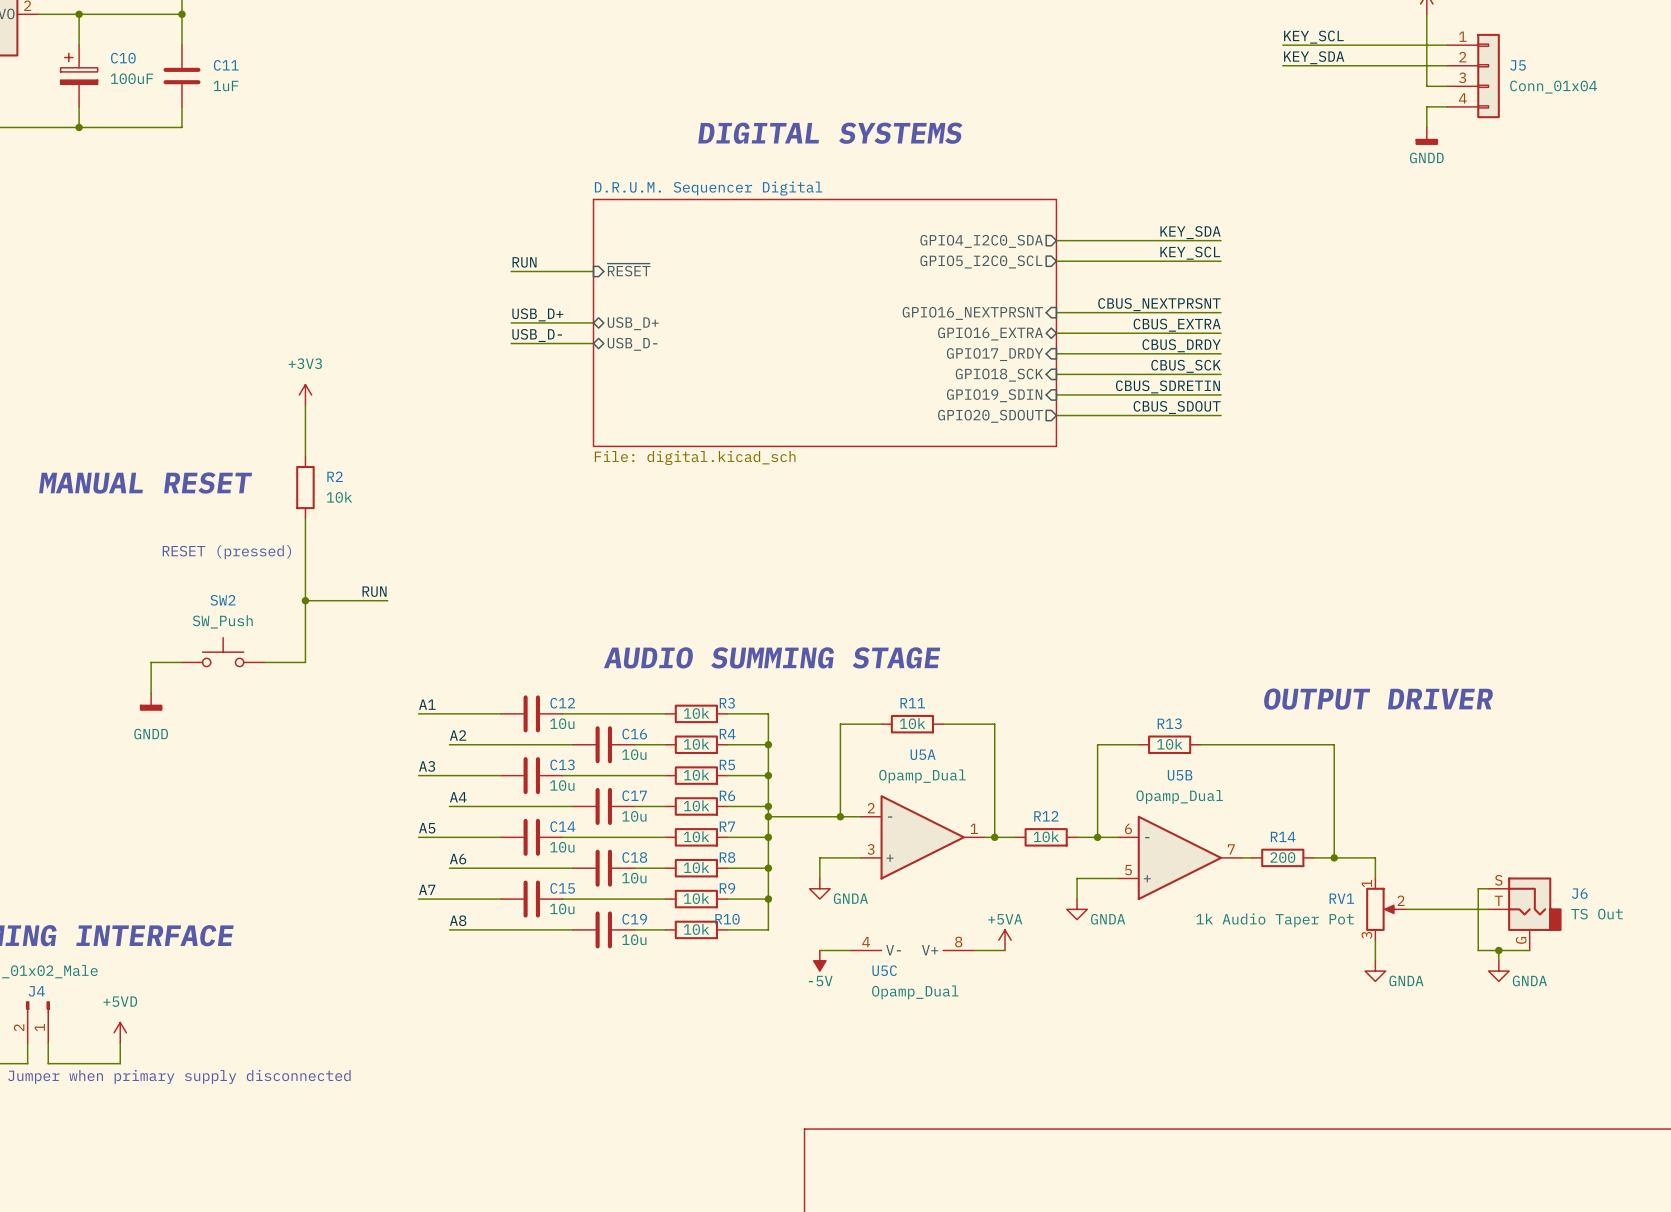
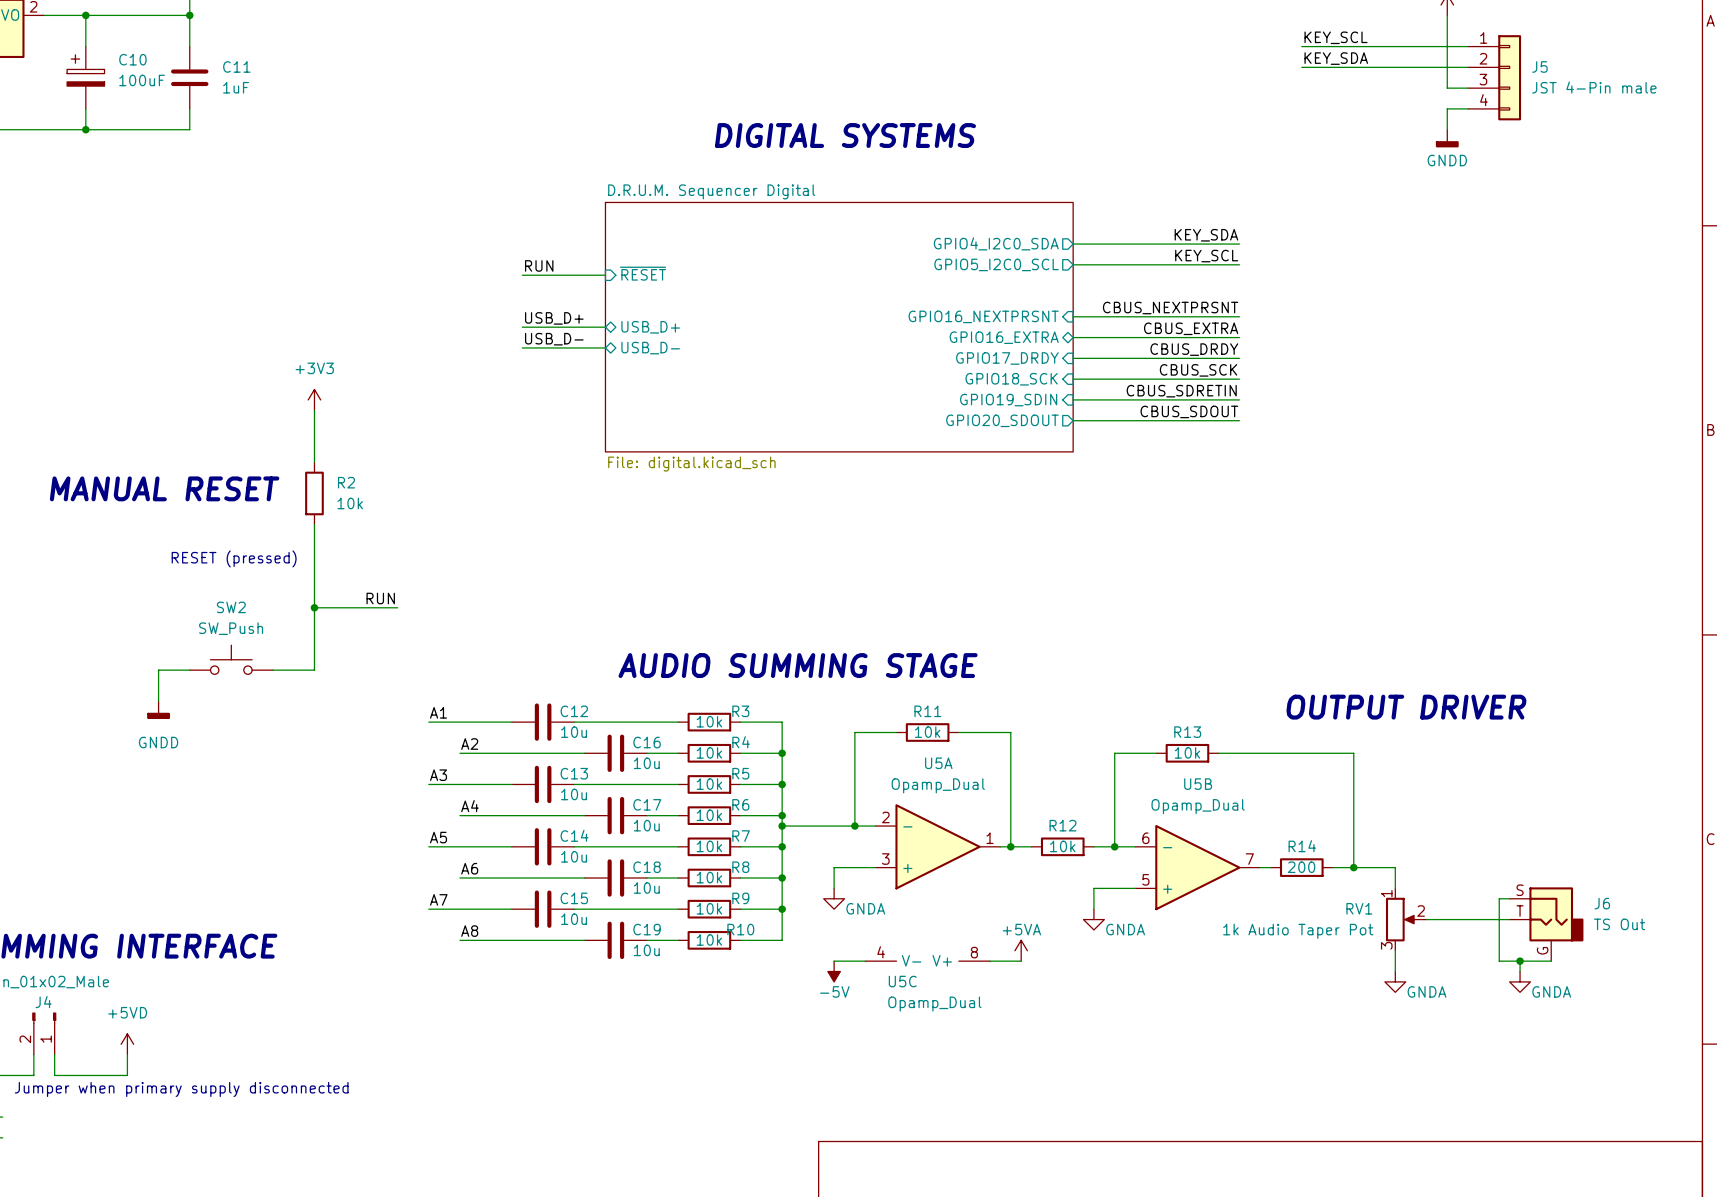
J5 value: Conn_01x04 (1553, 87) -> JST 4-Pin male (1594, 87)

